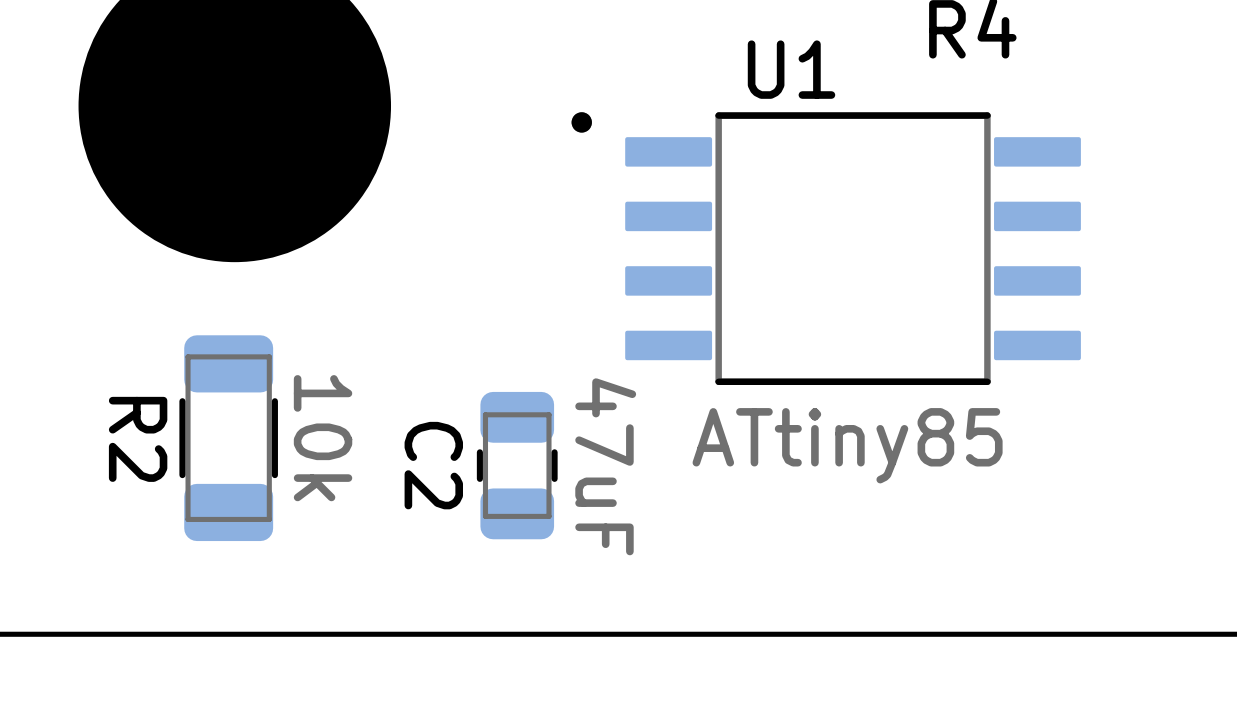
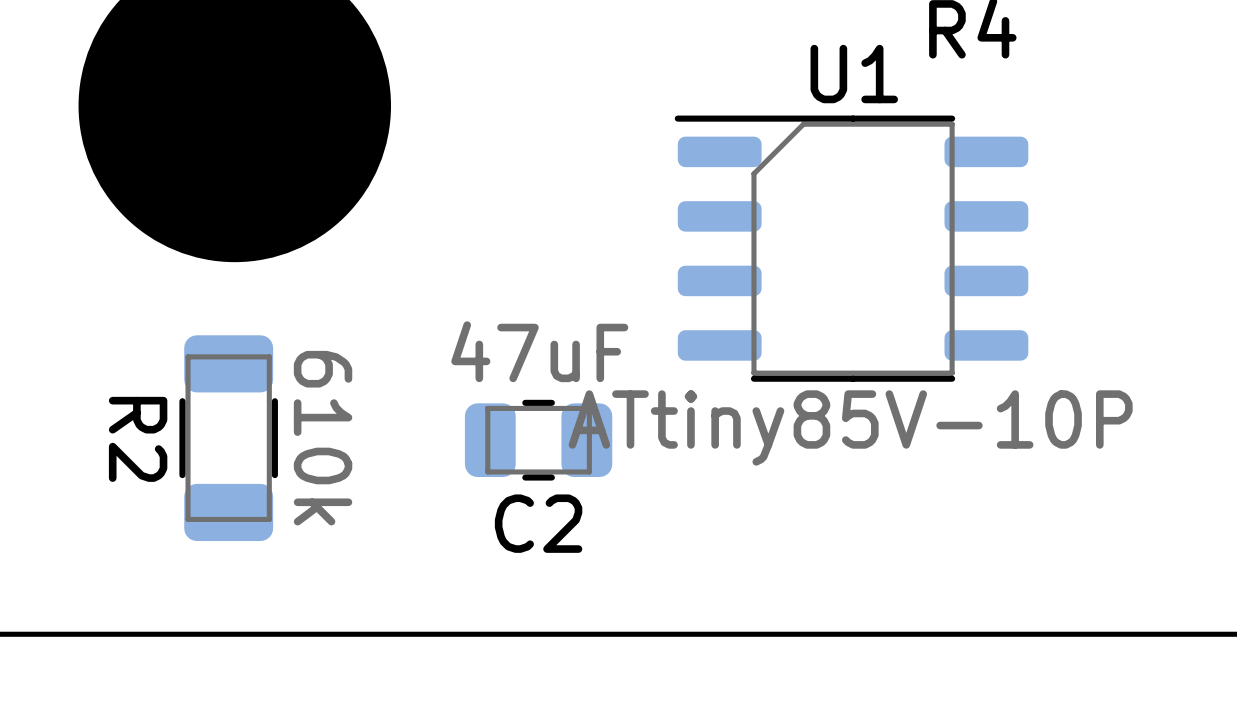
U1 footprint: [571, 112, 1081, 386] -> [674, 115, 1029, 382]
R2 value: 10k (323, 438) -> 610k (323, 438)
U1 value: ATtiny85 (847, 445) -> ATtiny85V-10P (850, 427)
C2 name position: C2 (433, 465) -> C2 (538, 523)
C2 rotation: 0° (517, 465) -> 90° clockwise (538, 440)
C2 value position: 47uF (605, 466) -> 47uF (539, 351)

